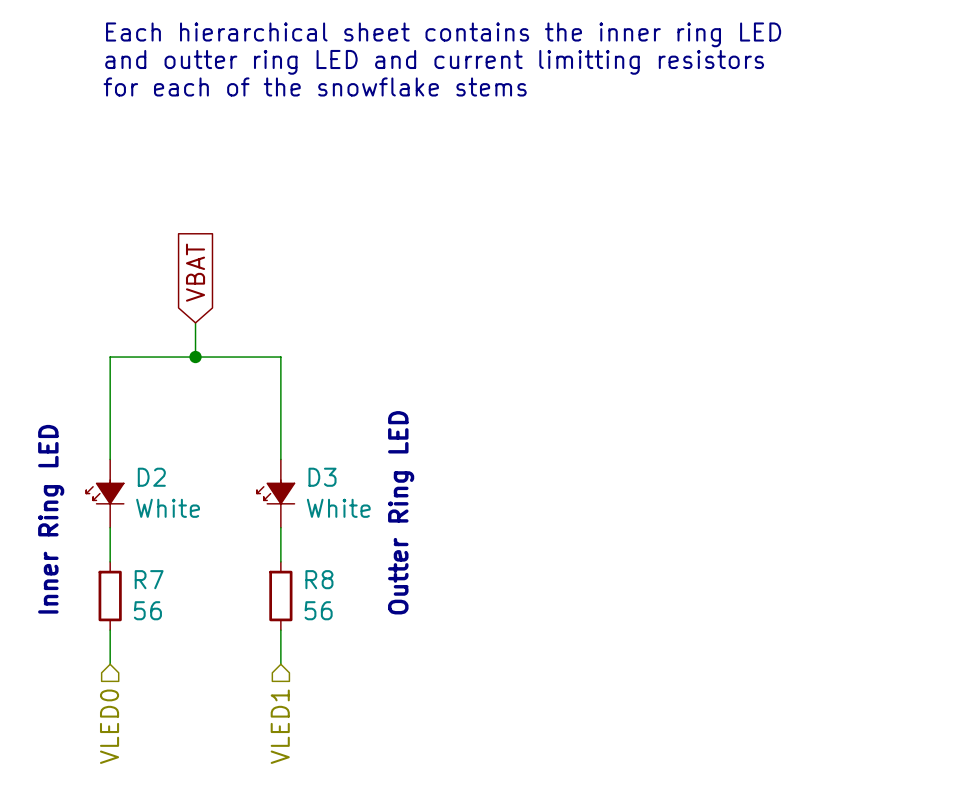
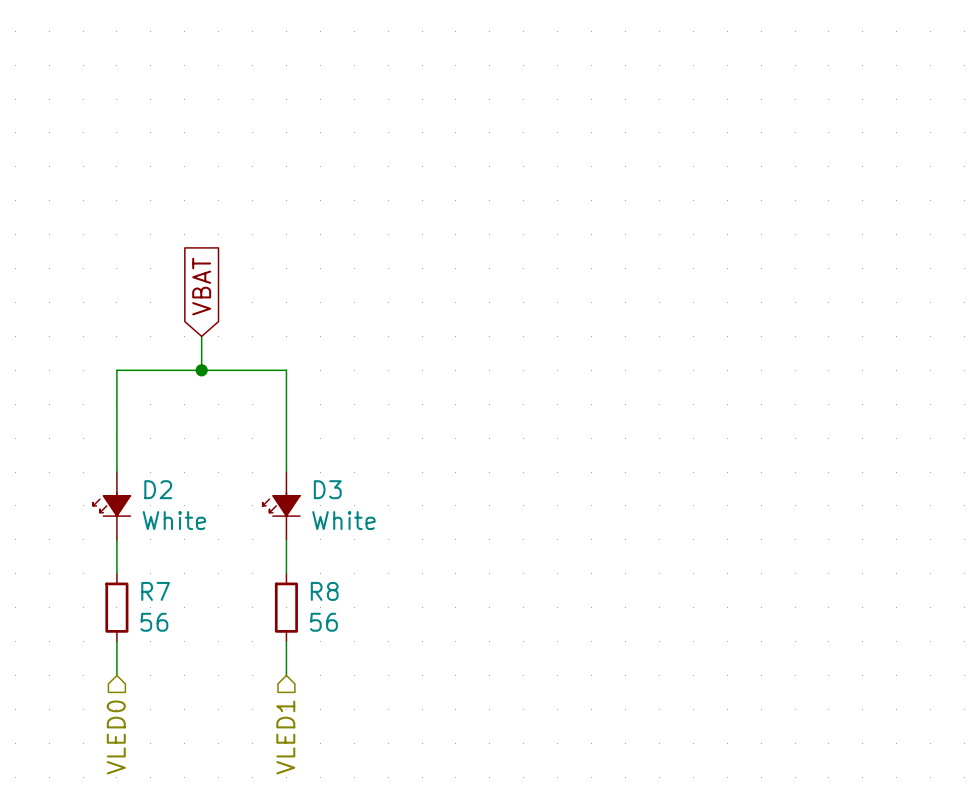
text: Each hierarchical sheet contains the inner ring LED (443, 34) -> none
text: and outter ring LED and current limitting resistors (434, 62) -> none
text: for each of the snowflake stems (315, 86) -> none
text: Outter Ring LED (401, 512) -> none
text: Inner Ring LED (51, 519) -> none

